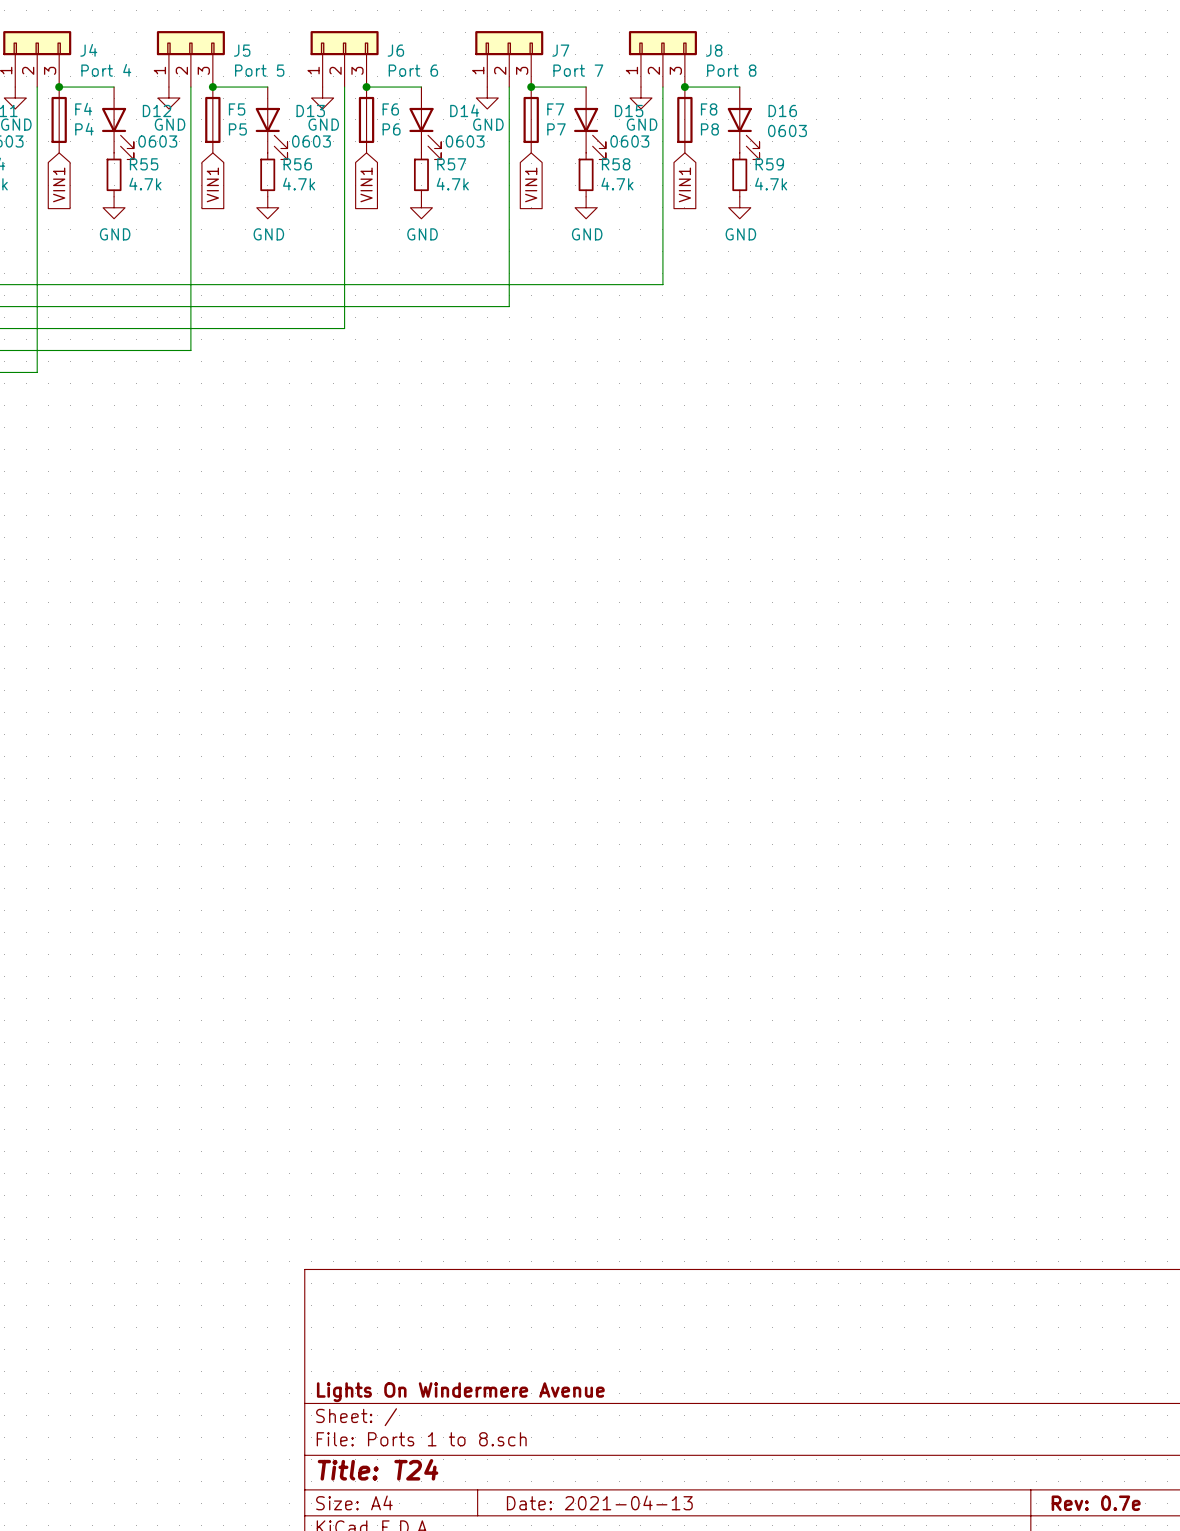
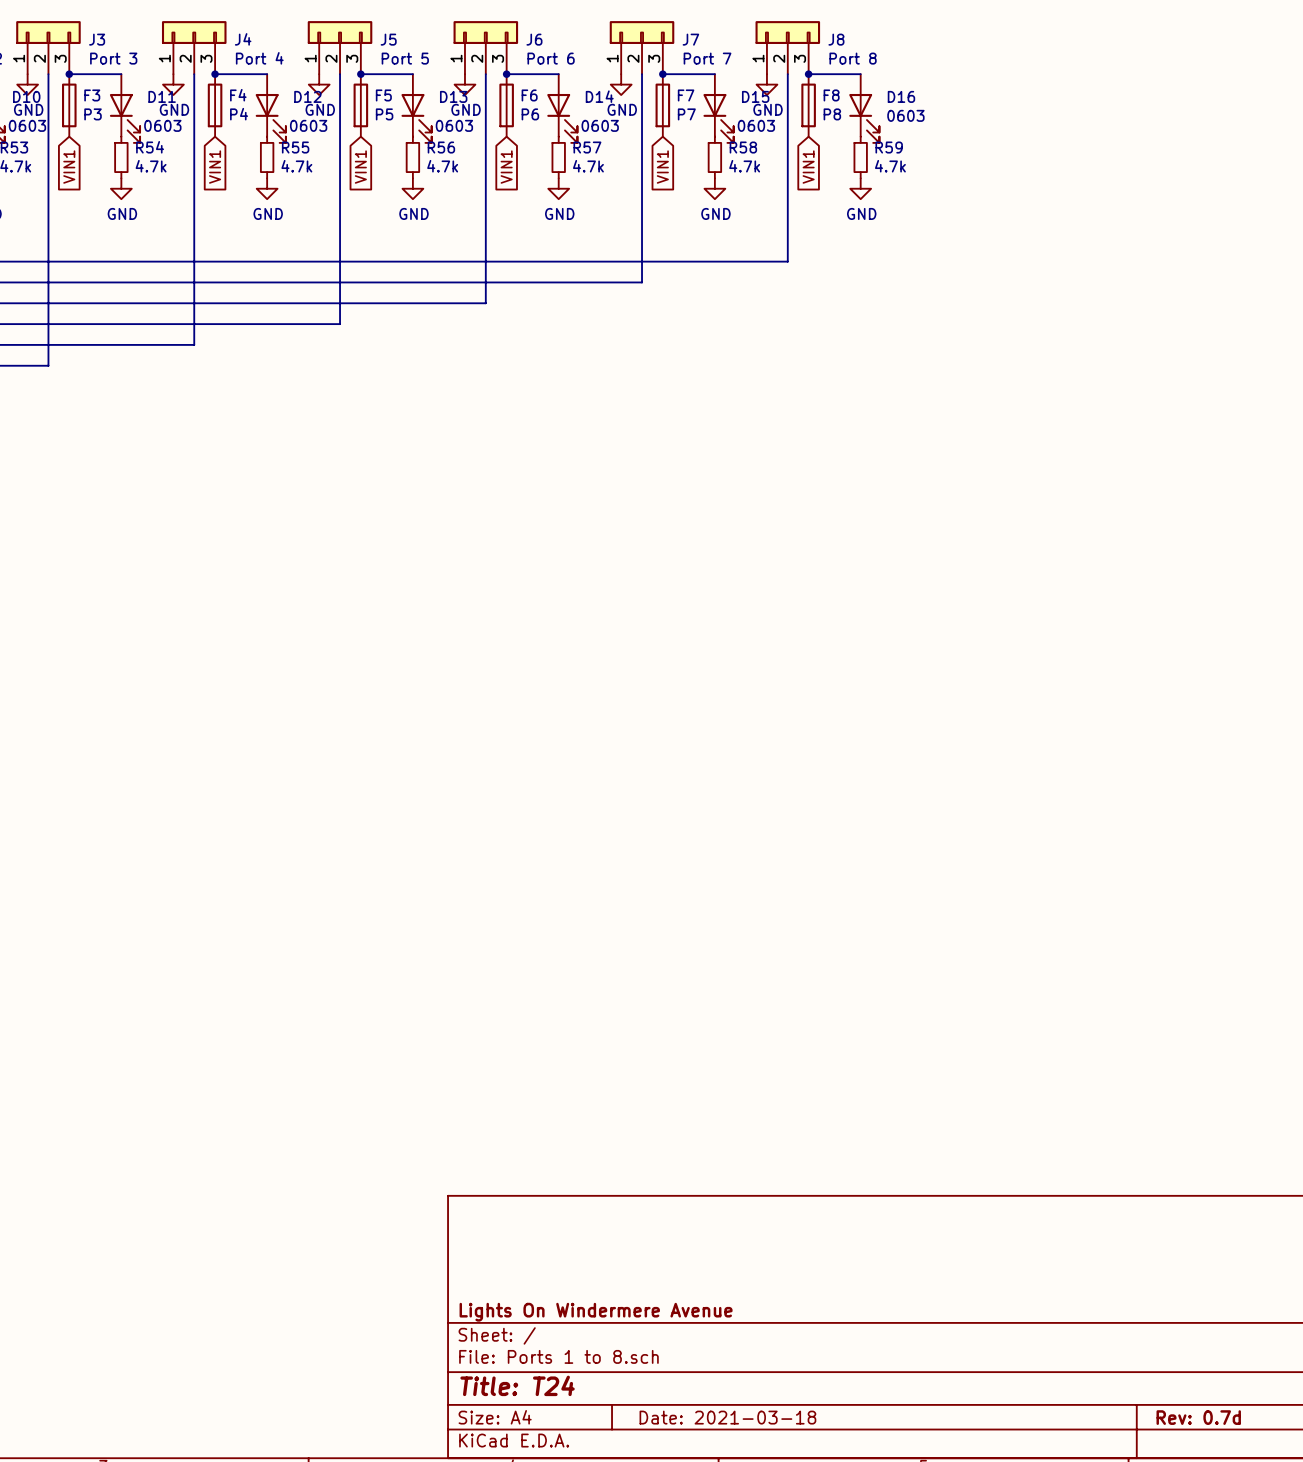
title block: Date: 2021-04-13 (599, 1502) -> Date: 2021-03-18 (727, 1417)
title block: Rev: 0.7e (1096, 1503) -> Rev: 0.7d (1198, 1417)

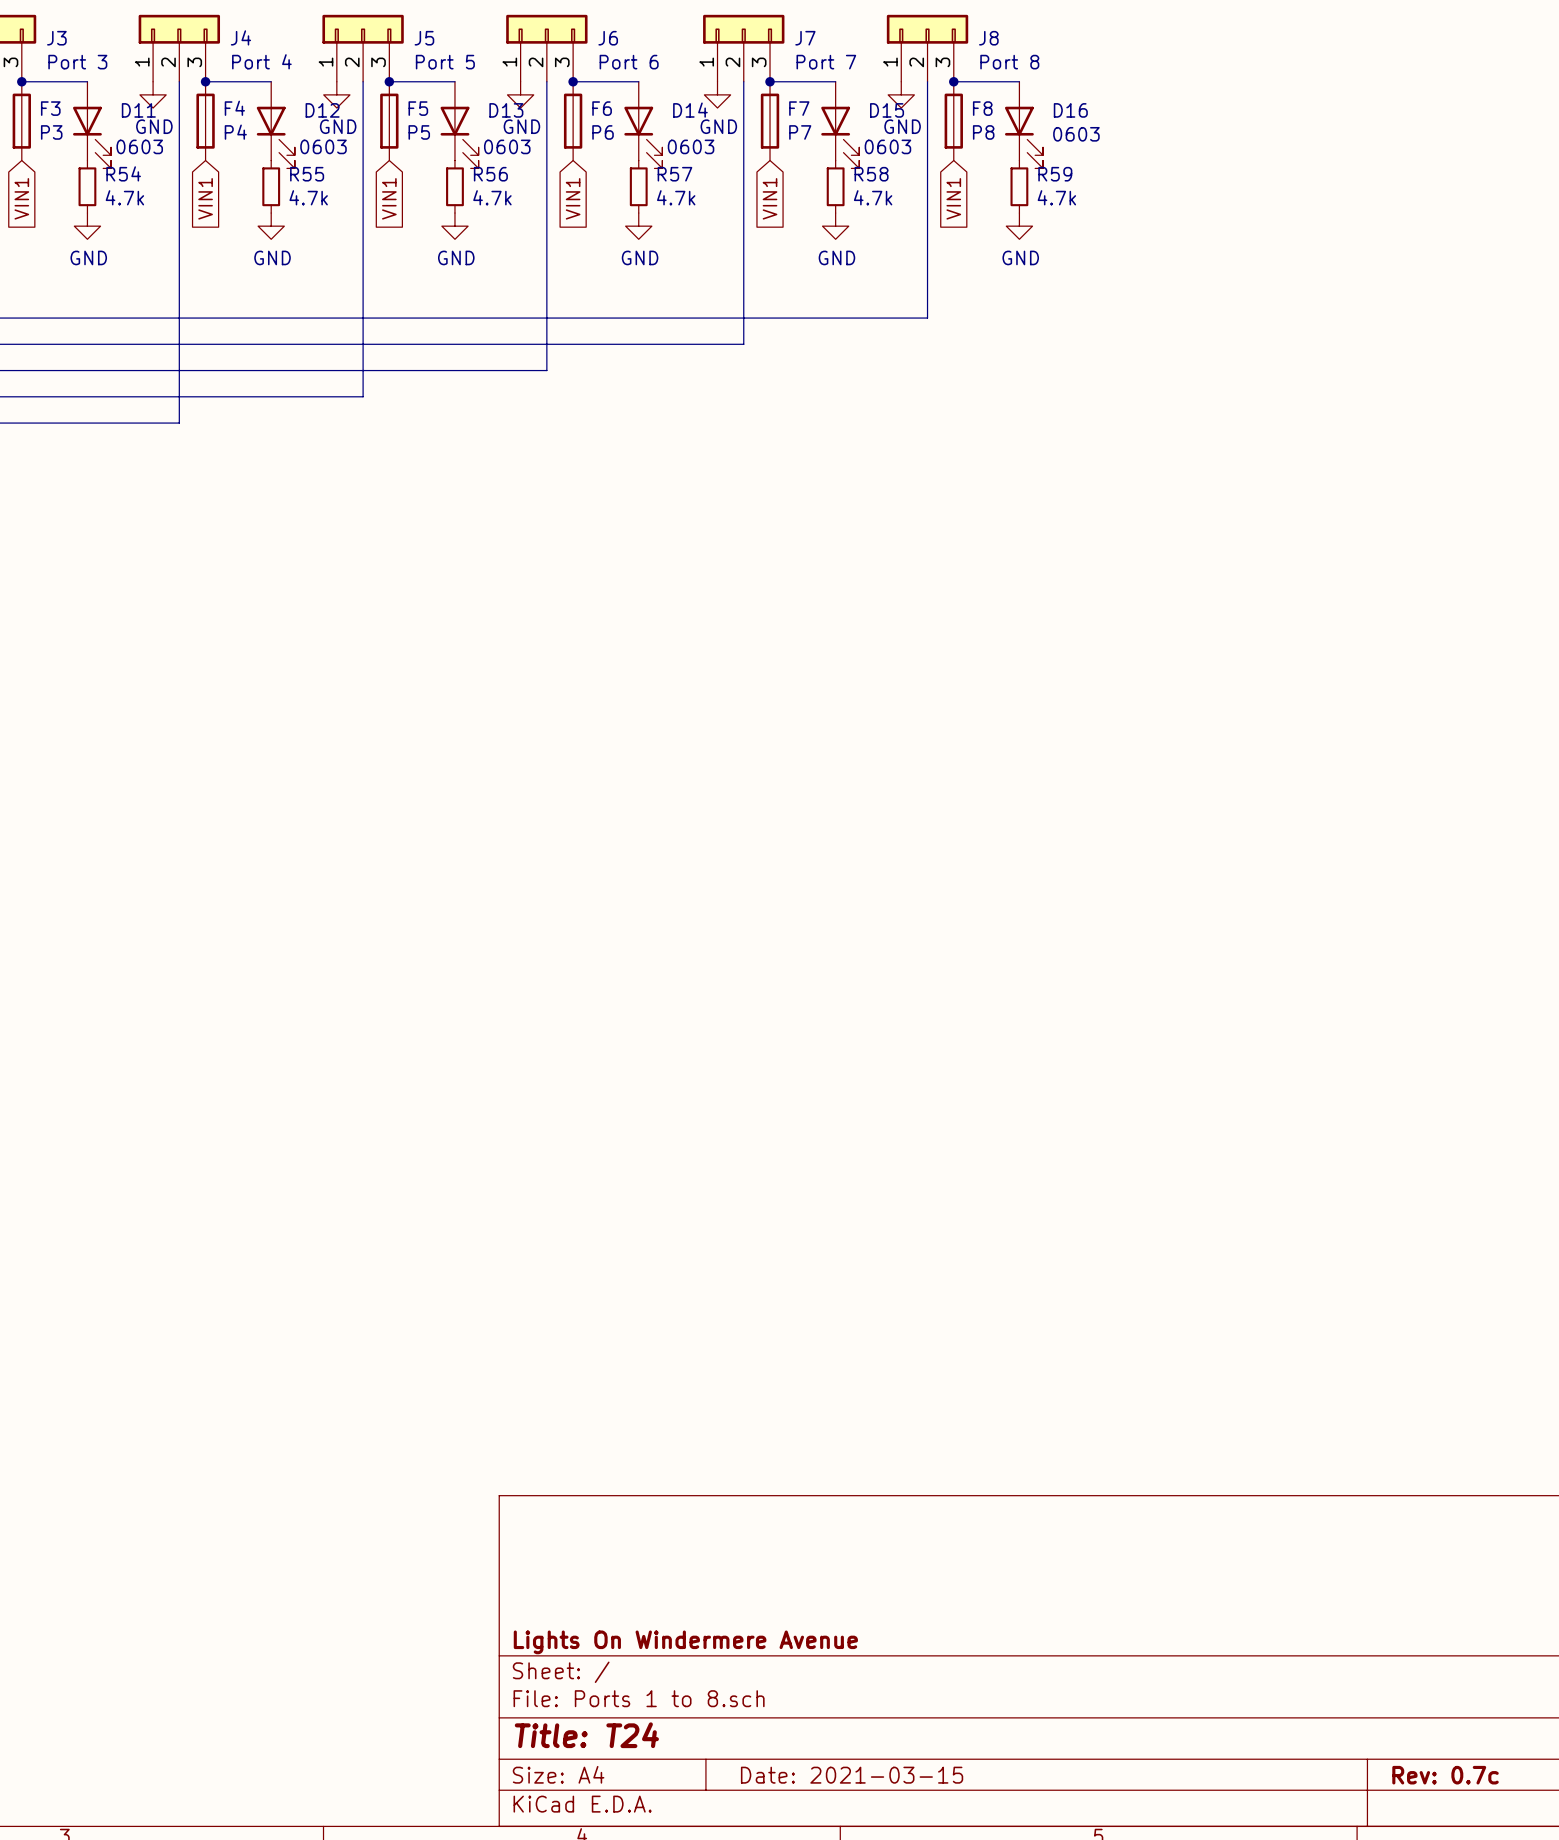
title block: Date: 2021-03-18 (727, 1417) -> Date: 2021-03-15 (852, 1775)
title block: Rev: 0.7d (1198, 1417) -> Rev: 0.7c (1445, 1775)

